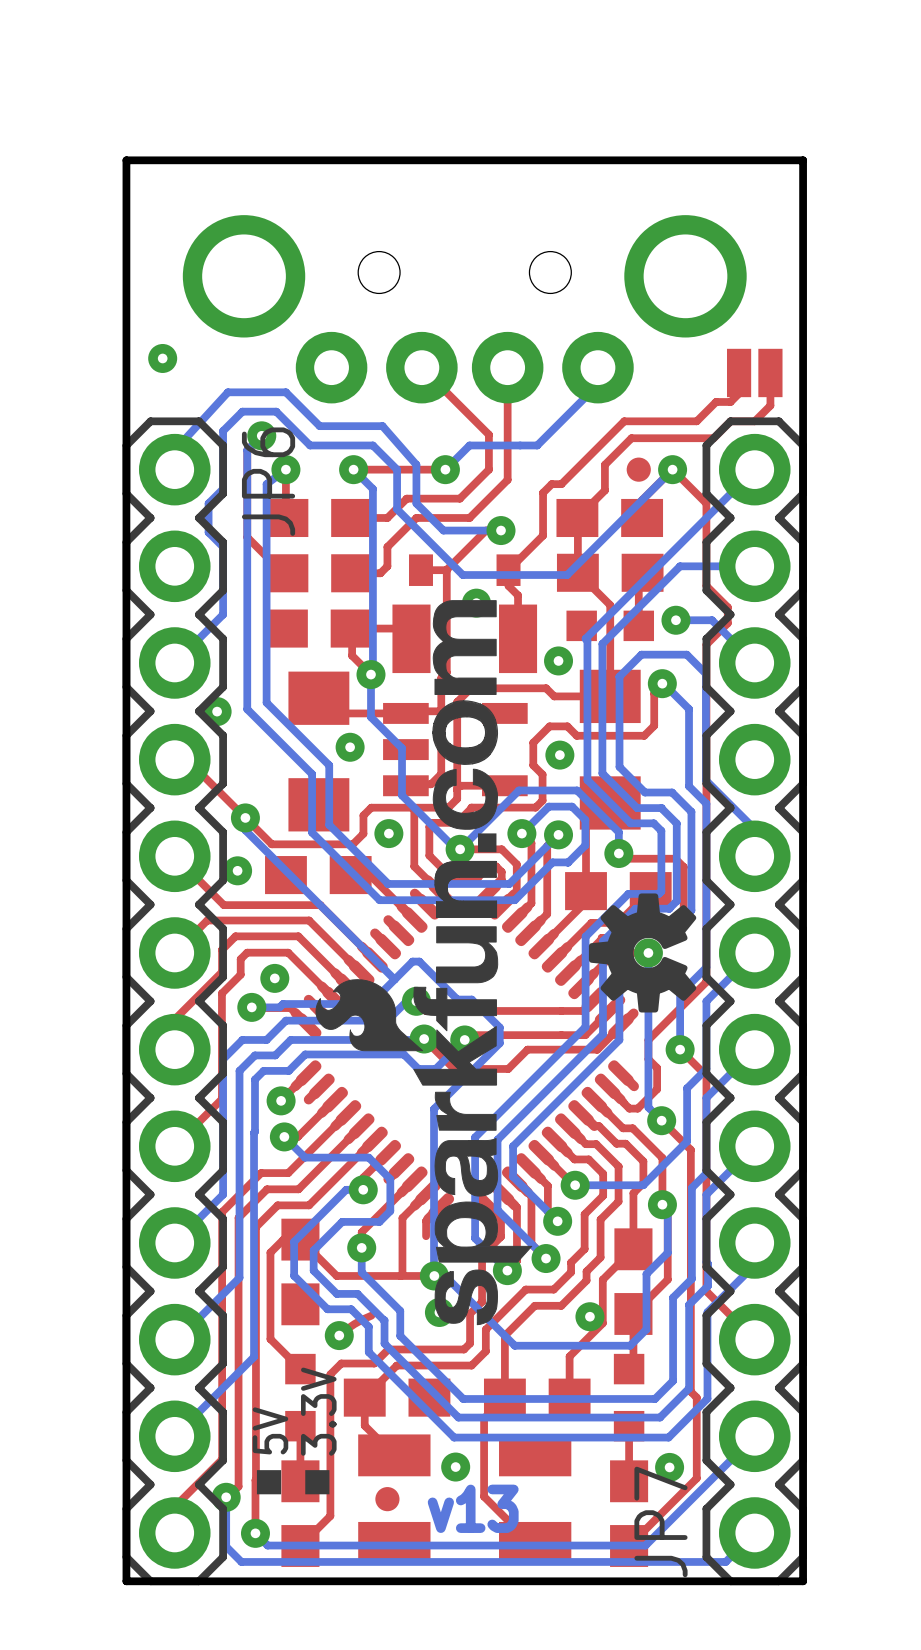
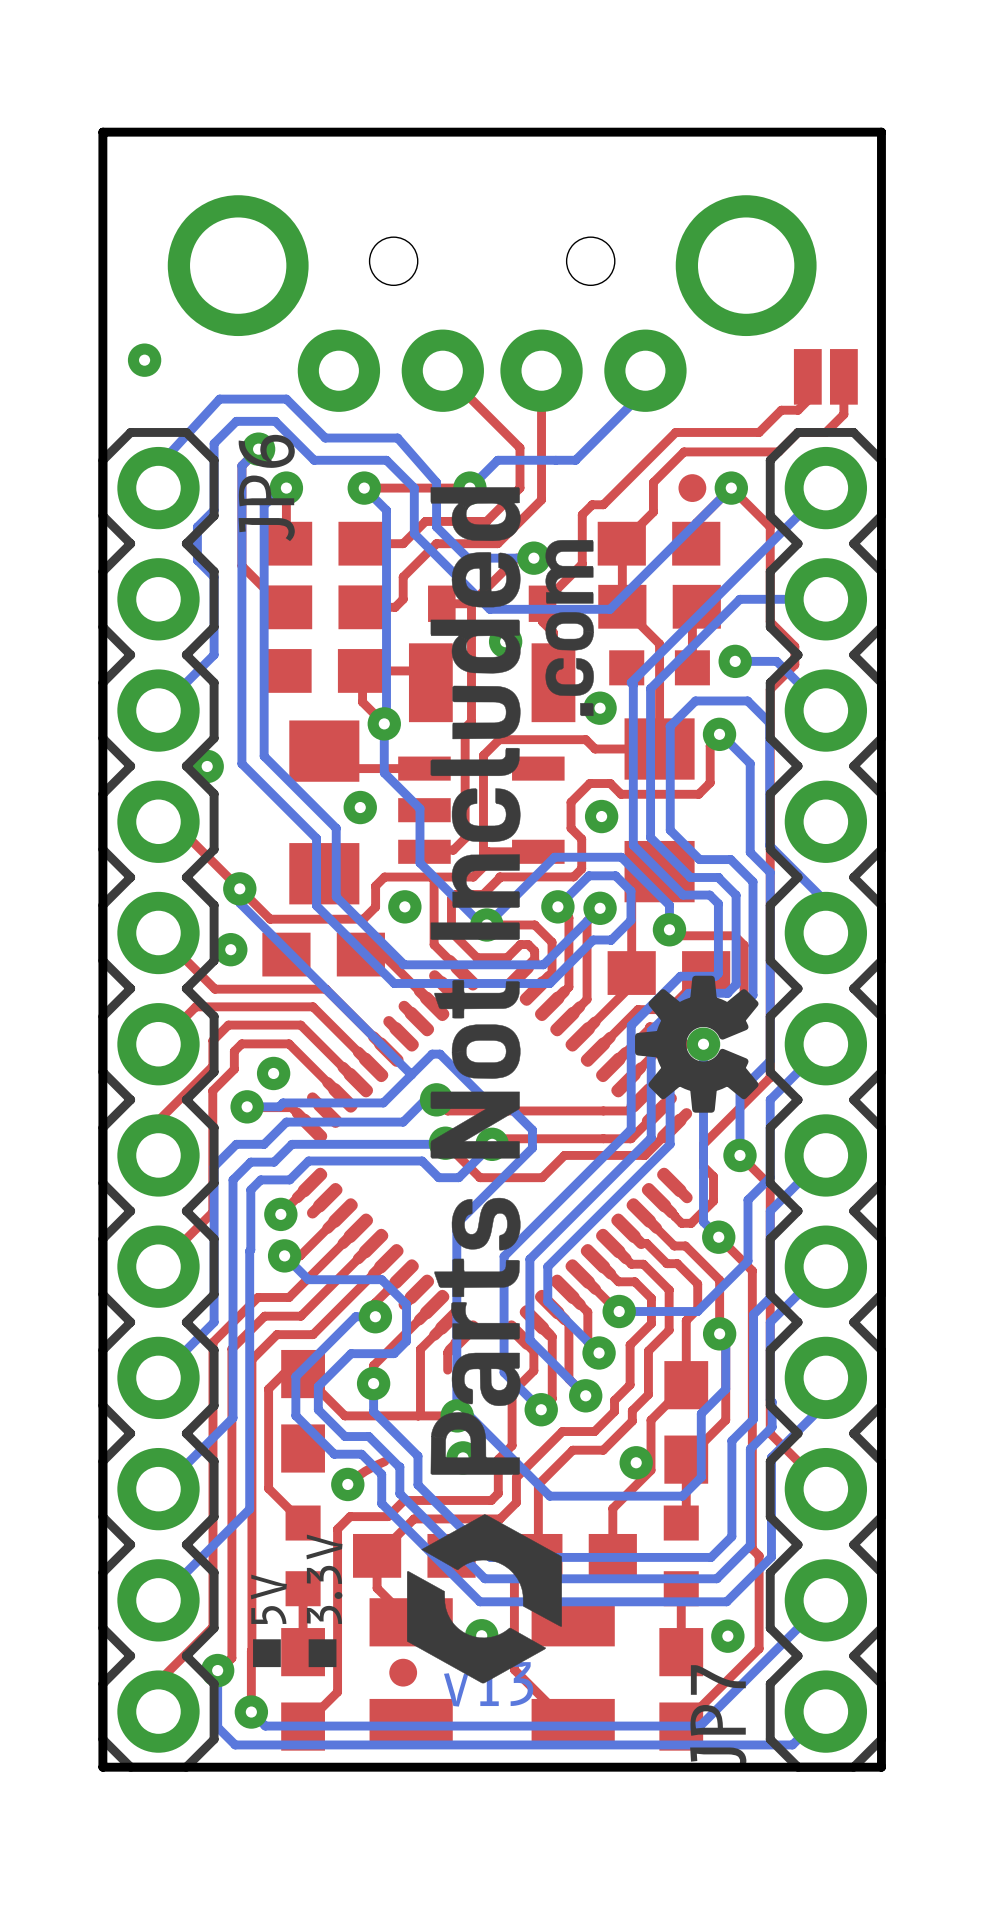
drawing: none -> [406, 487, 594, 1684]
drawing: [315, 600, 533, 1326] -> none

